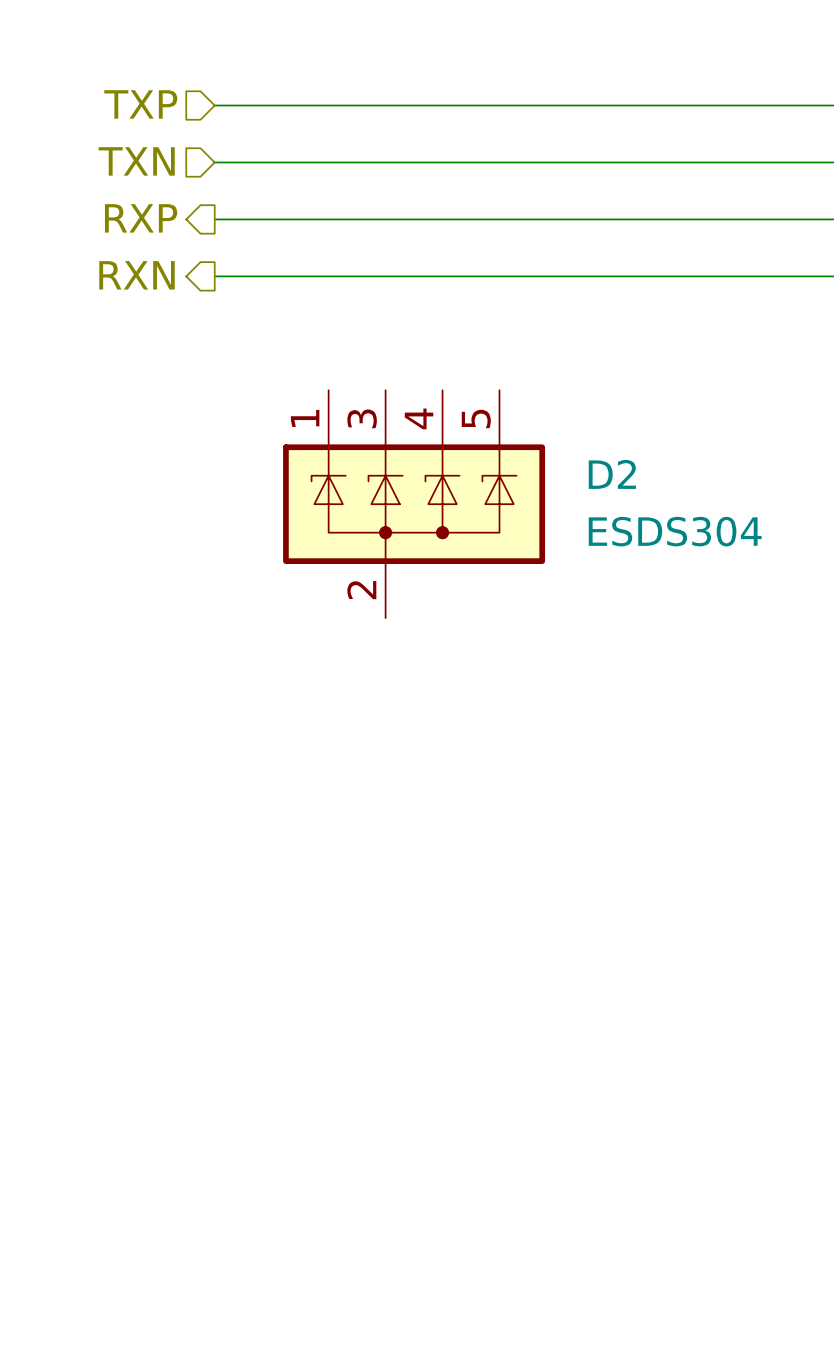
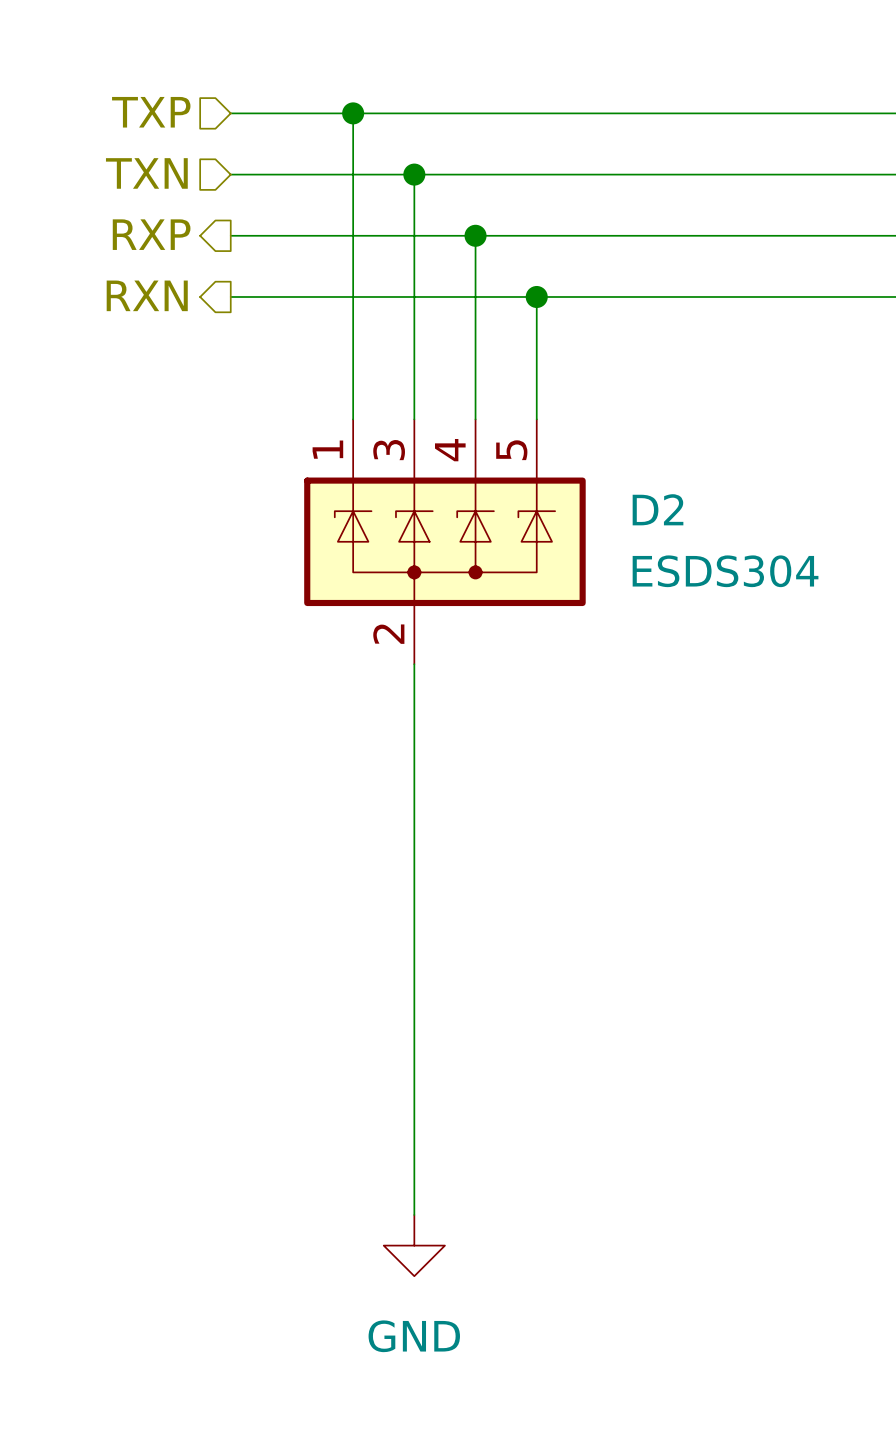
wire: none -> (353, 113) (353, 419)
junction: none -> (353, 113)
wire: none -> (414, 174) (414, 419)
junction: none -> (414, 174)
wire: none -> (475, 235) (475, 419)
junction: none -> (475, 235)
wire: none -> (536, 296) (536, 419)
junction: none -> (536, 296)
wire: none -> (414, 664) (414, 1214)
power symbol: none -> GND (414, 1245)

